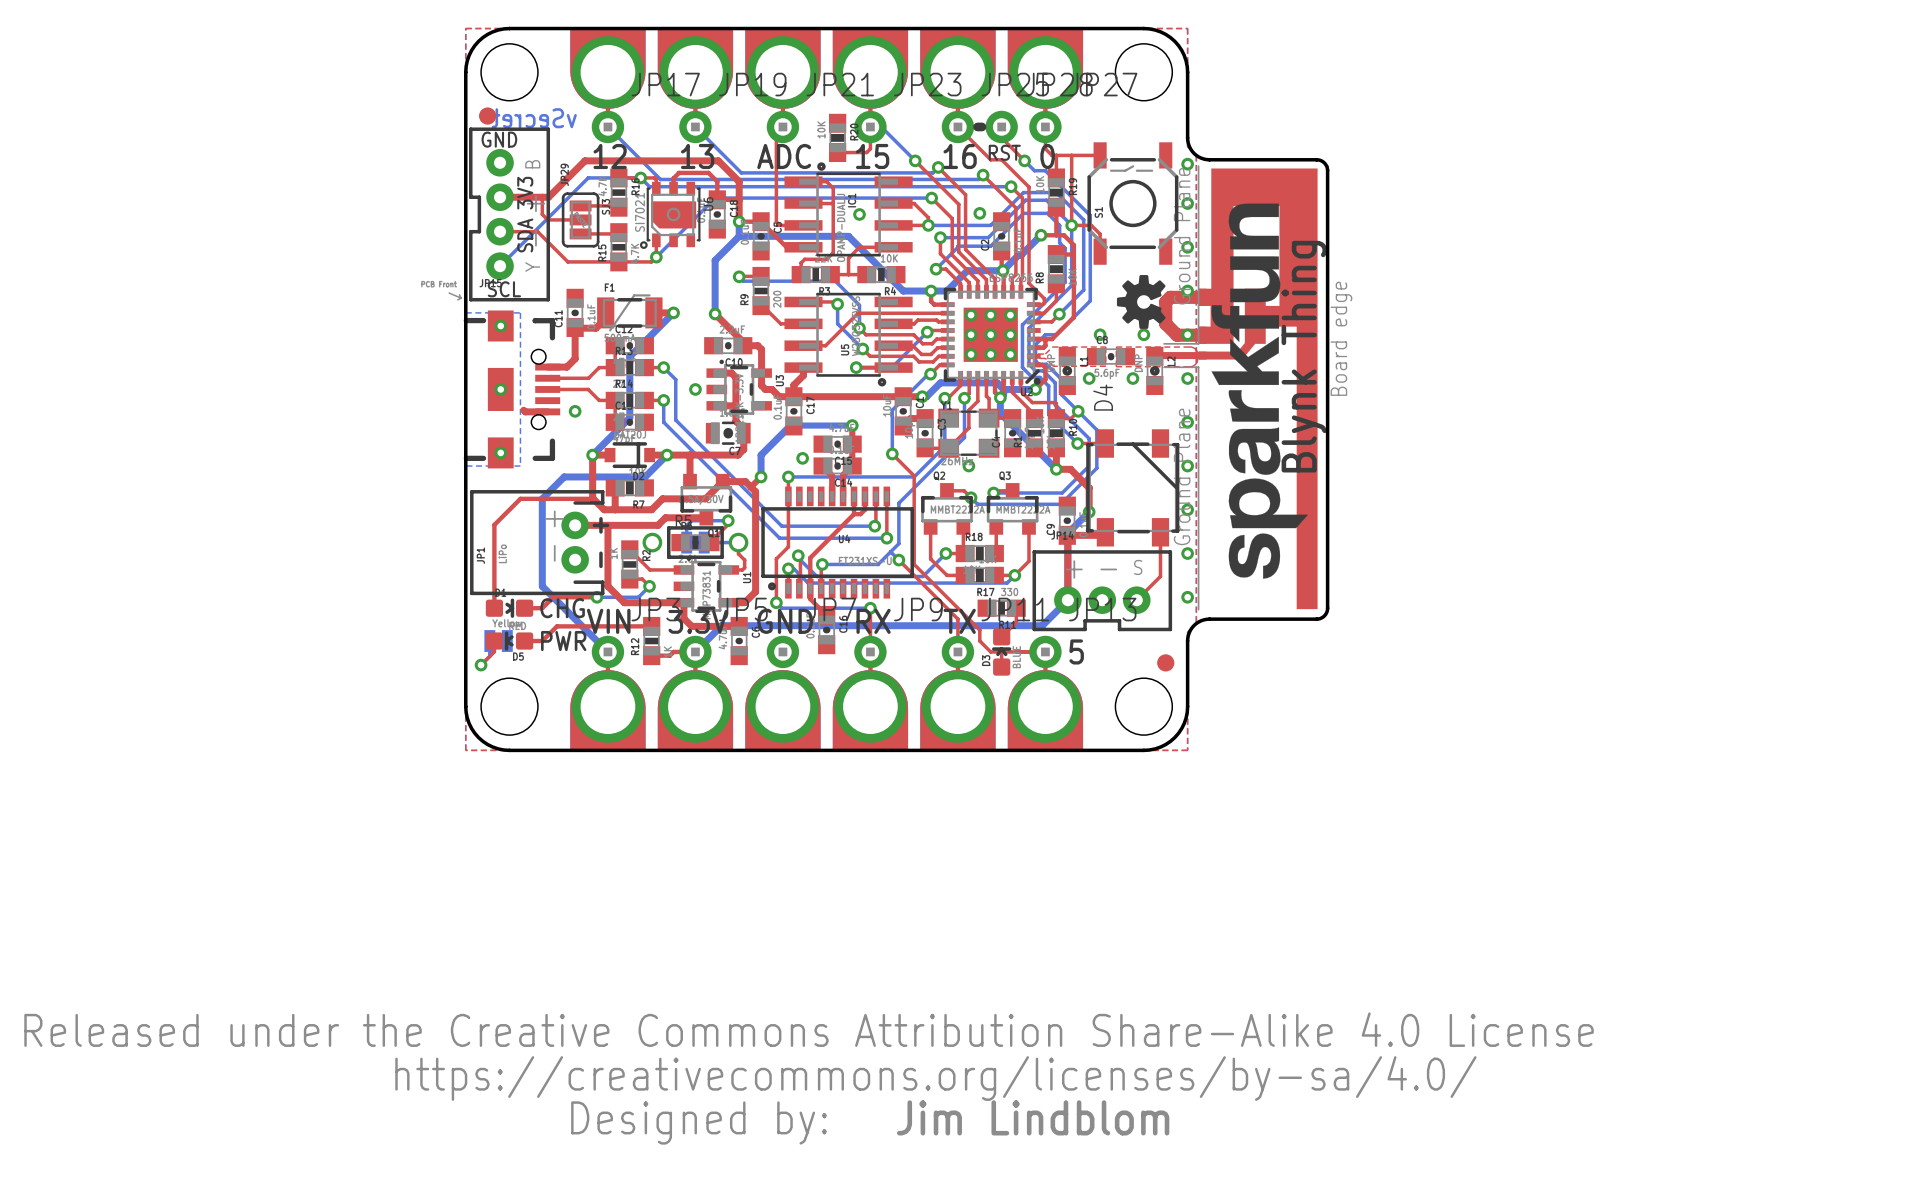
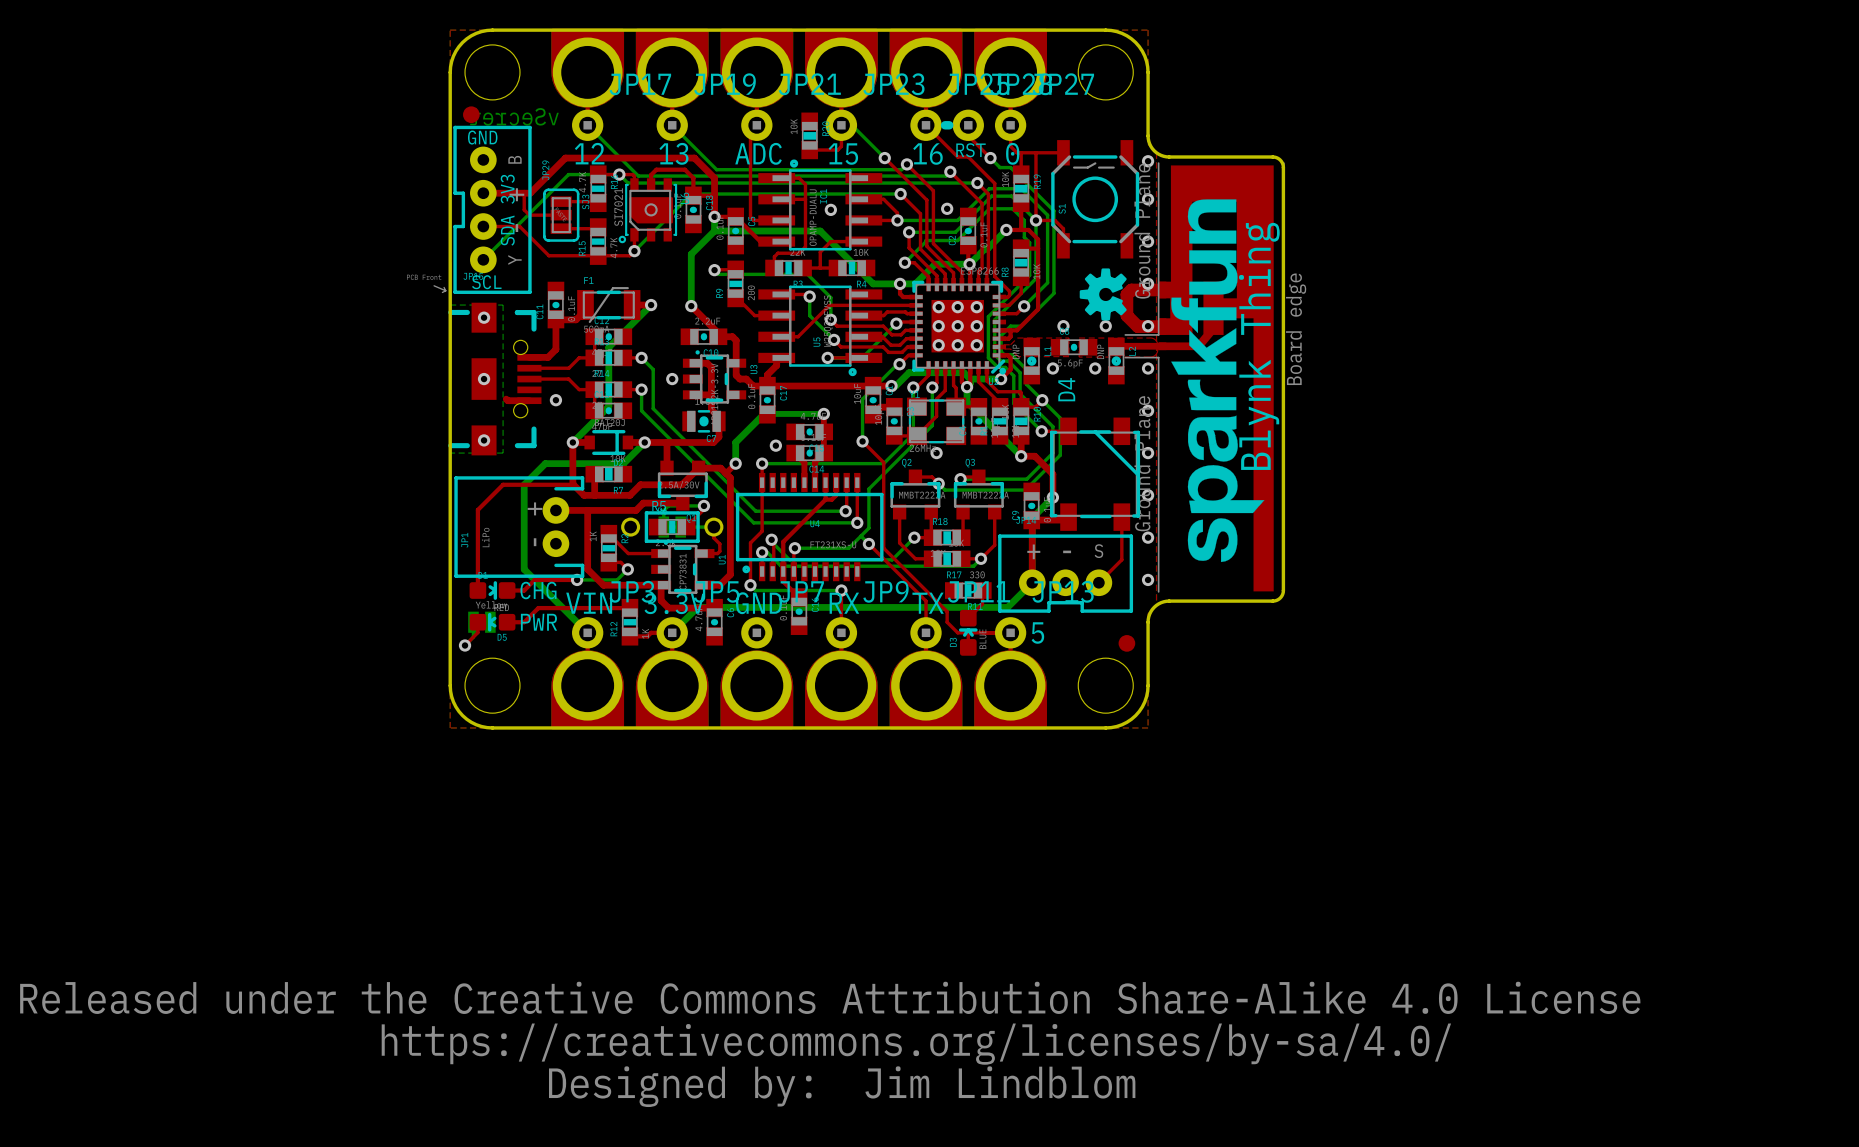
line: (600, 518) (600, 531) -> none
line: (594, 525) (607, 525) -> none
line: (600, 553) (600, 566) -> none

